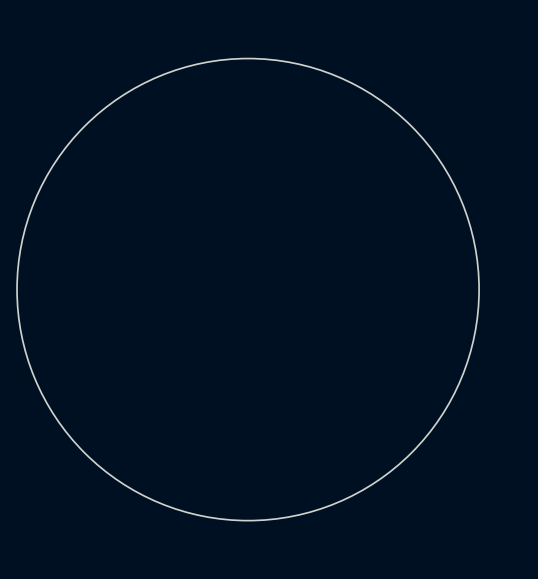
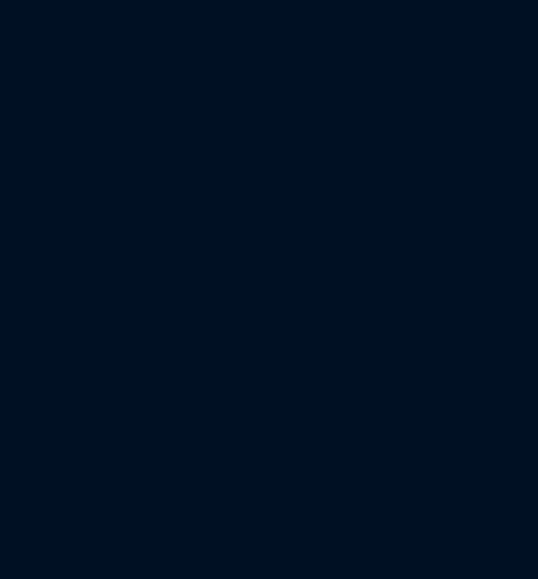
round board edge: [16, 57, 480, 522] -> none

